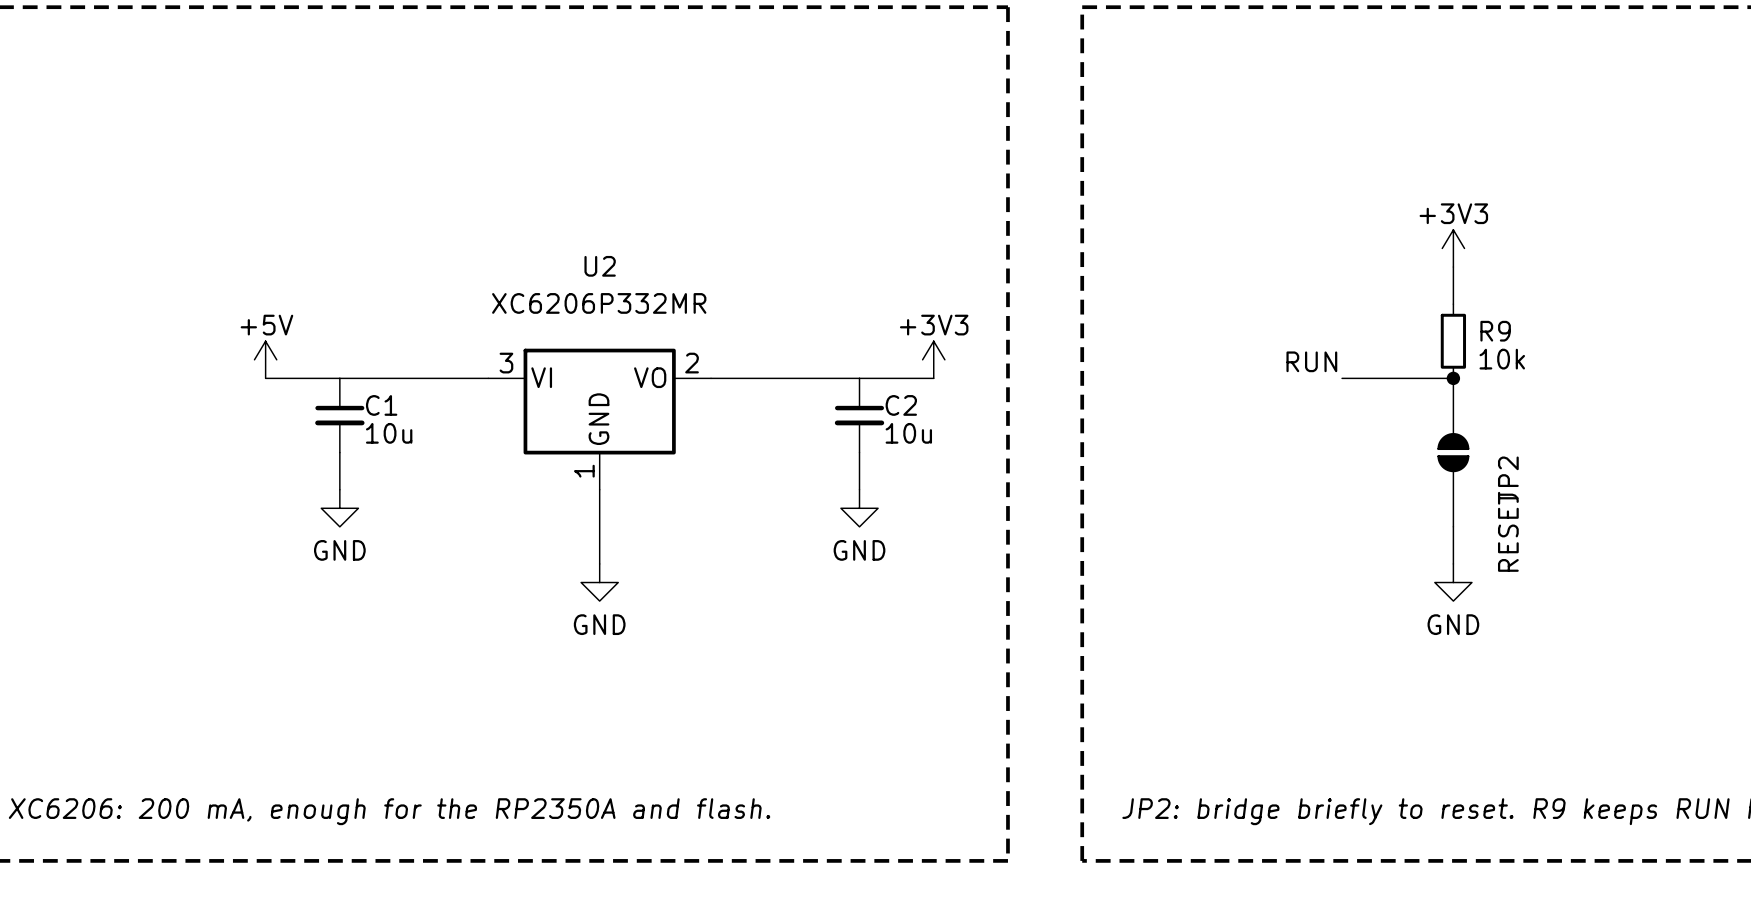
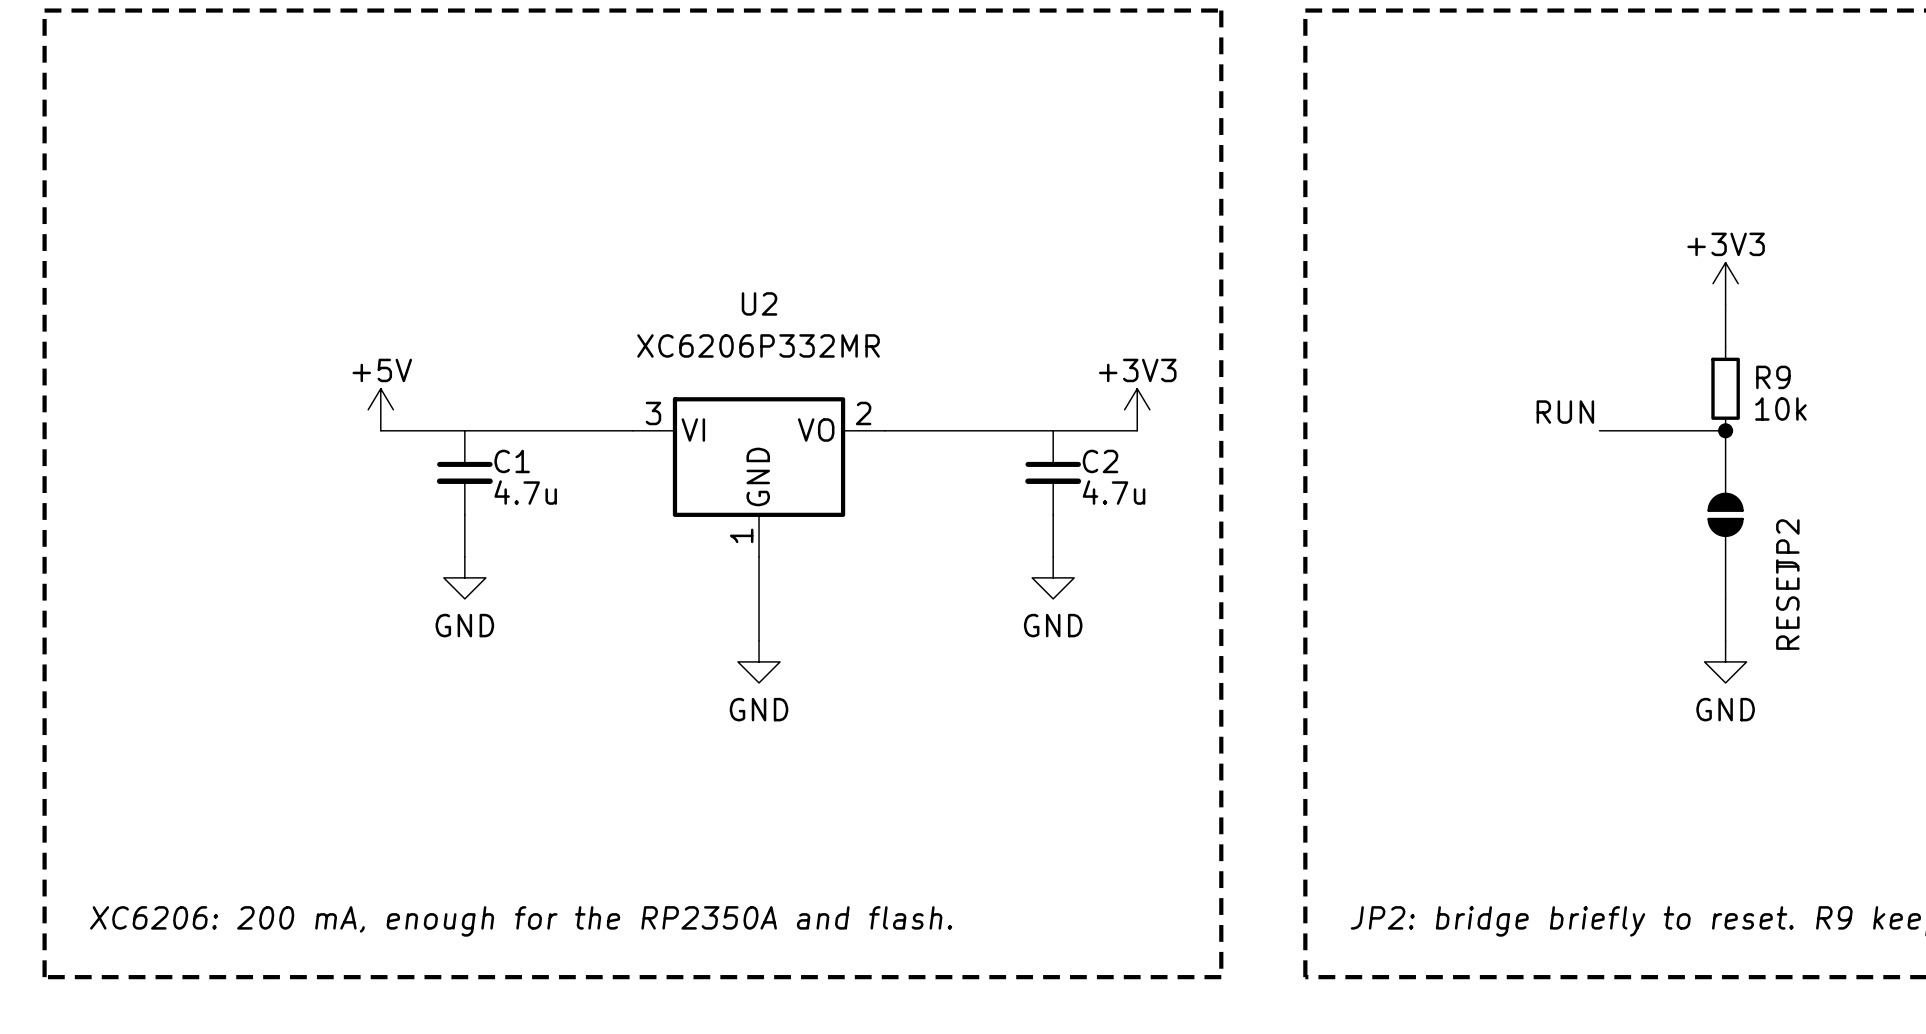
C1 value: 10u (389, 433) -> 4.7u (525, 492)
C2 value: 10u (908, 433) -> 4.7u (1114, 492)

